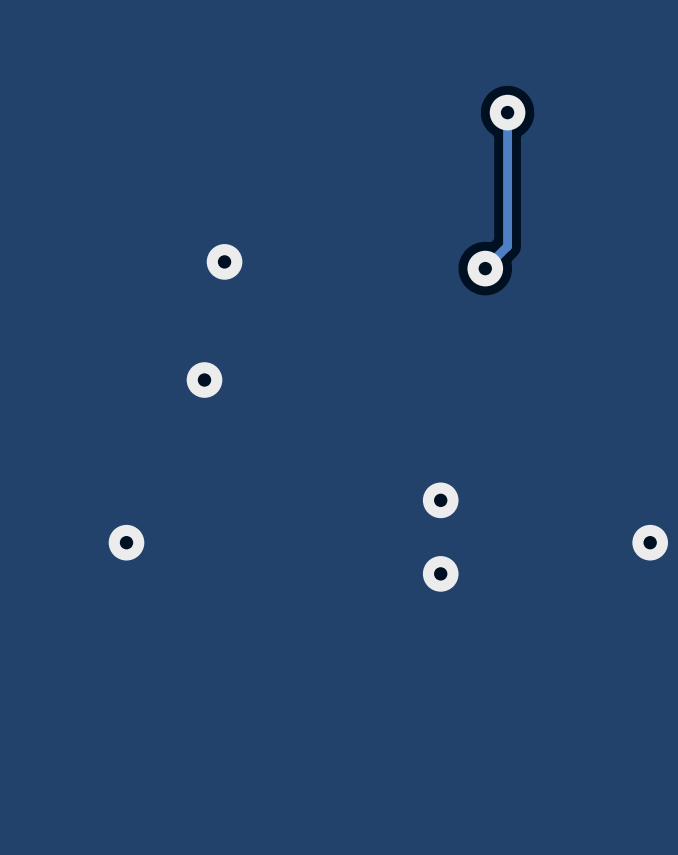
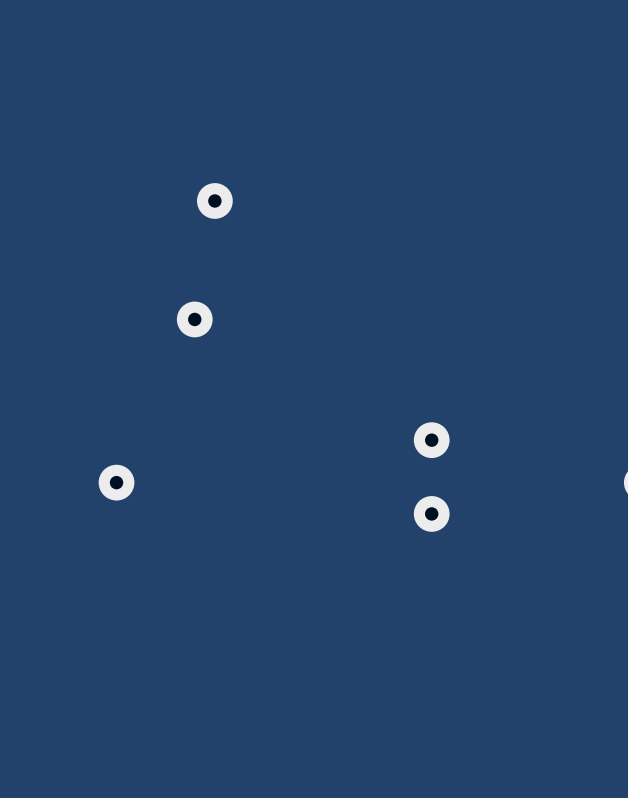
track: (507, 112) (507, 246) (485, 268) -> none
via: (507, 112) -> none
via: (485, 268) -> none

